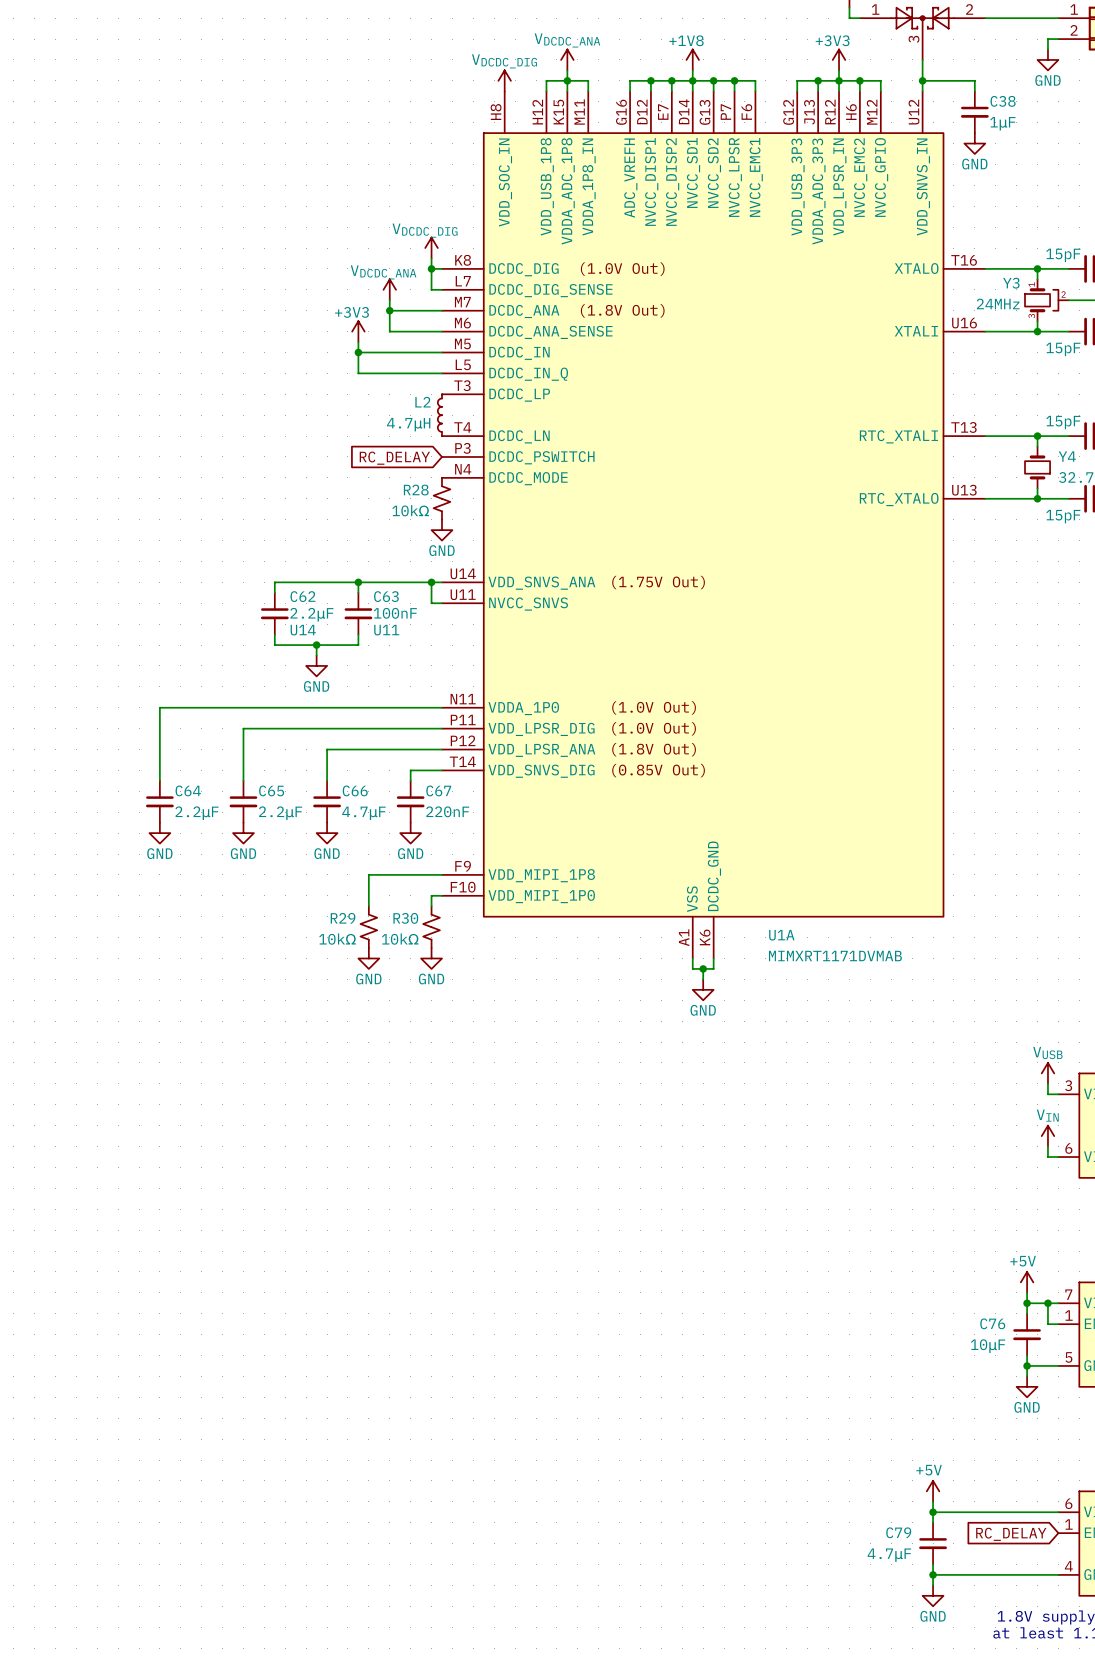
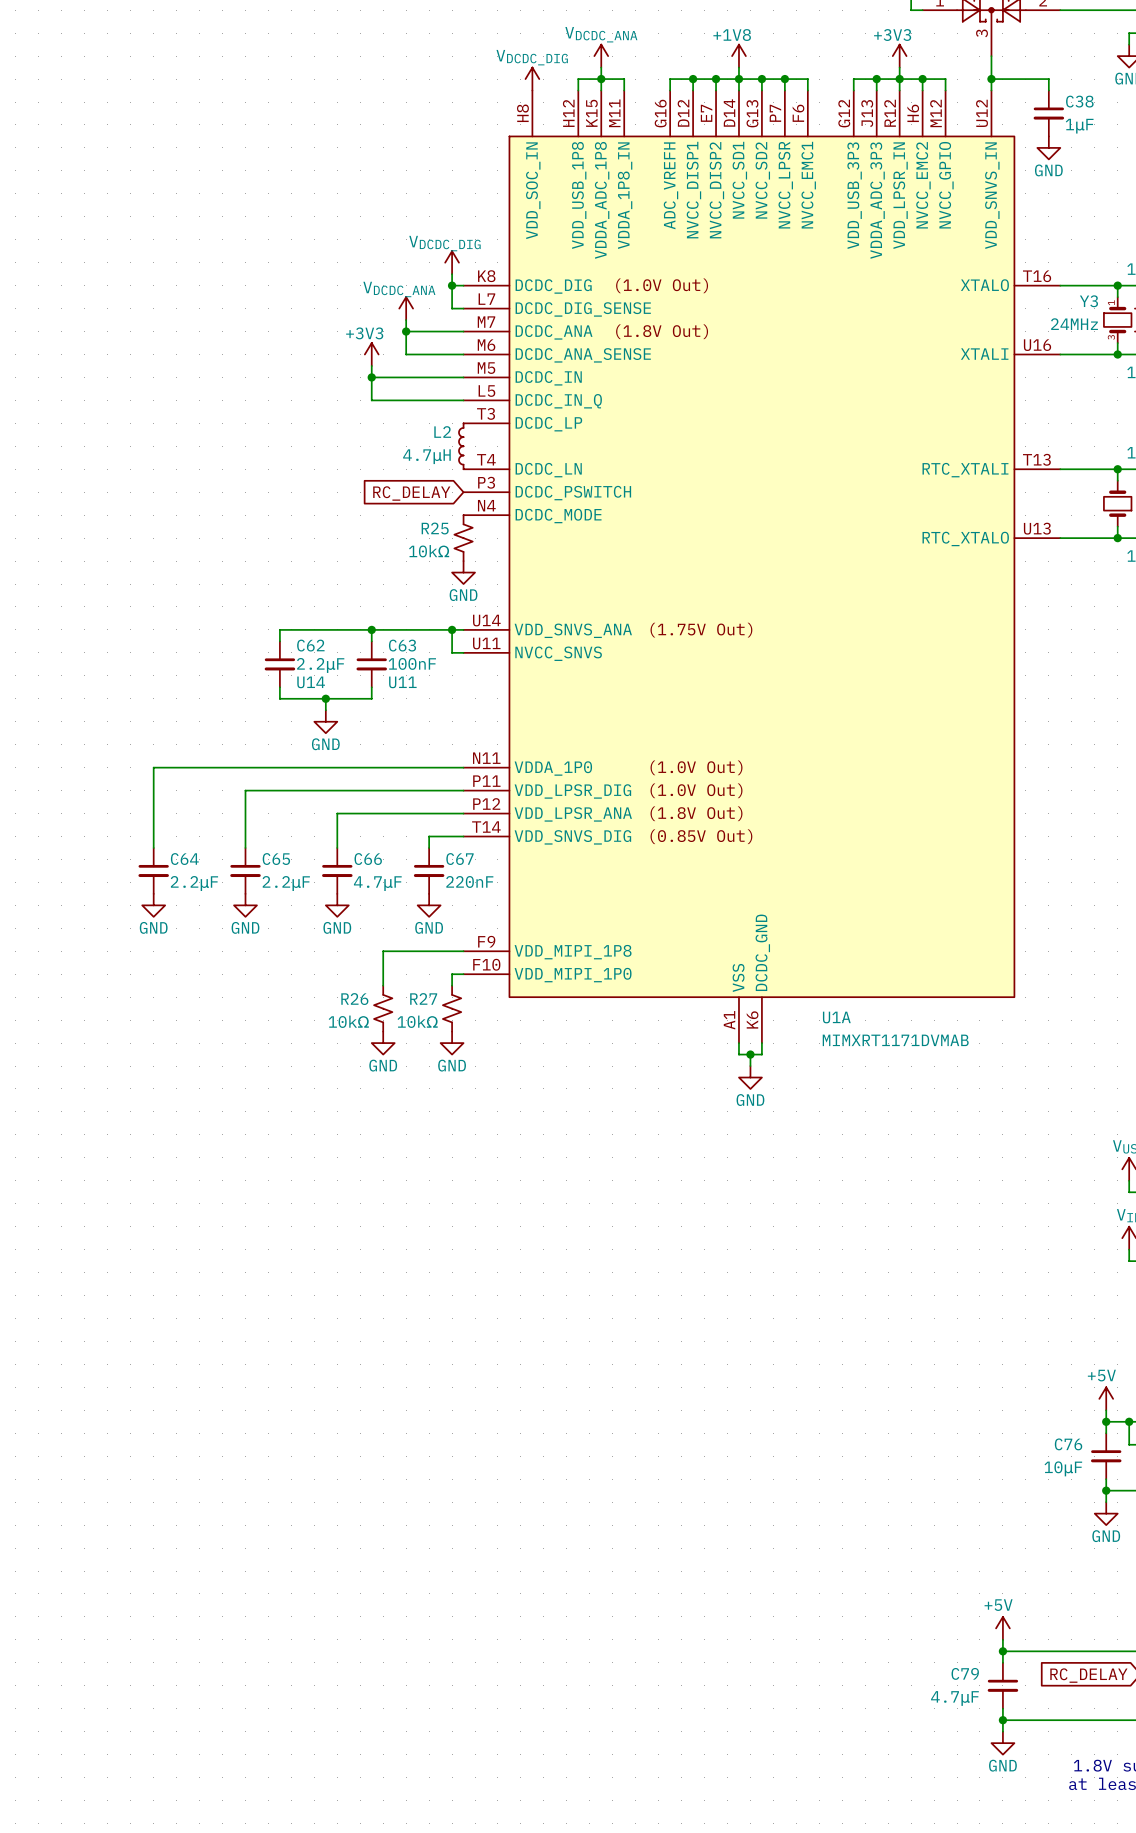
R28 name: R28 (416, 490) -> R25 (435, 528)
R29 name: R29 (343, 918) -> R26 (354, 999)
R30 name: R30 (405, 918) -> R27 (423, 998)

